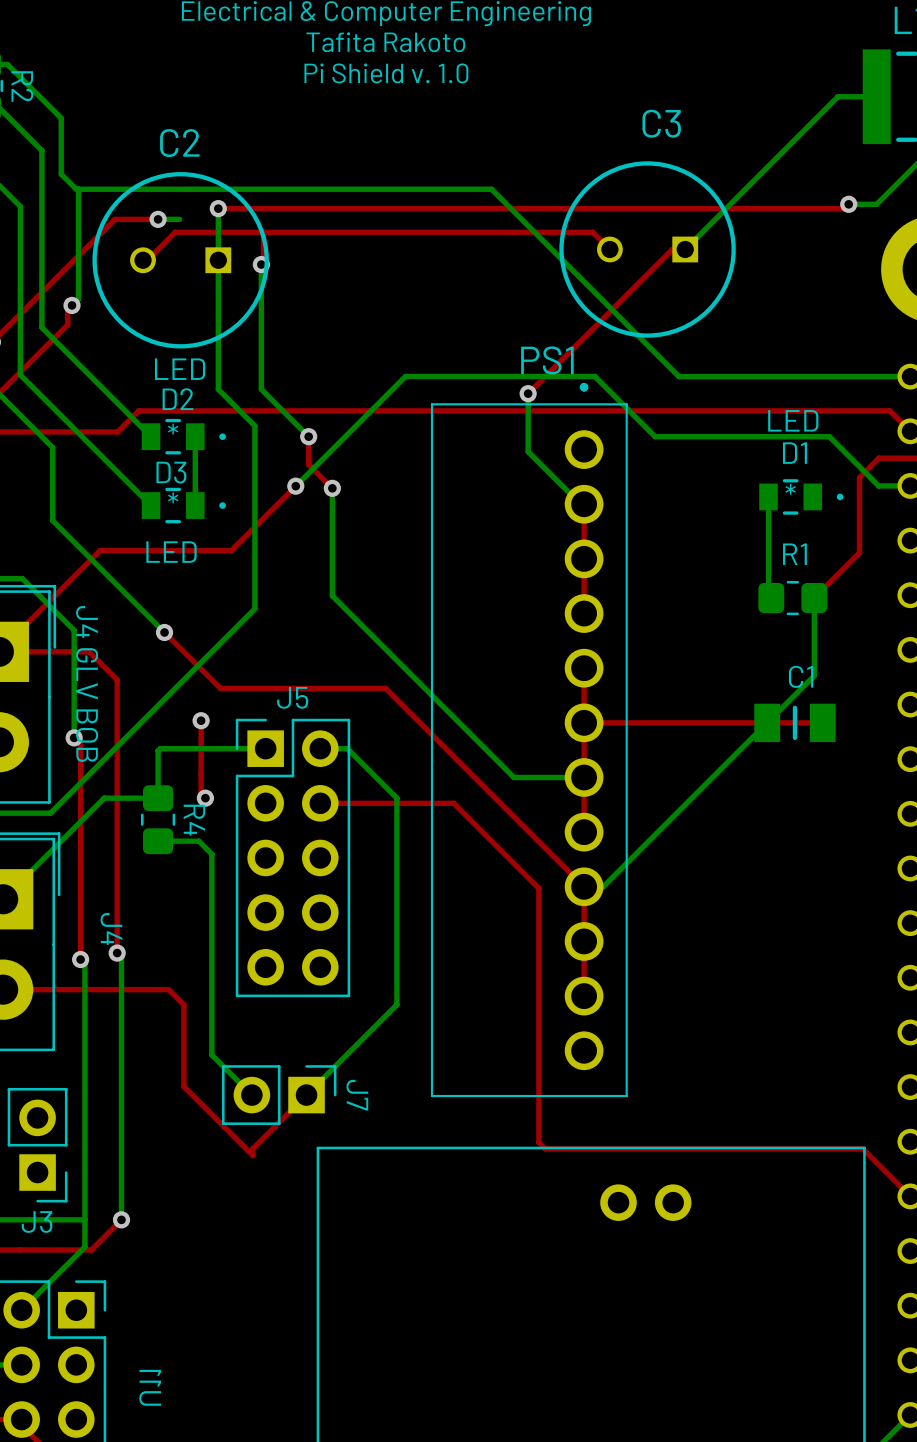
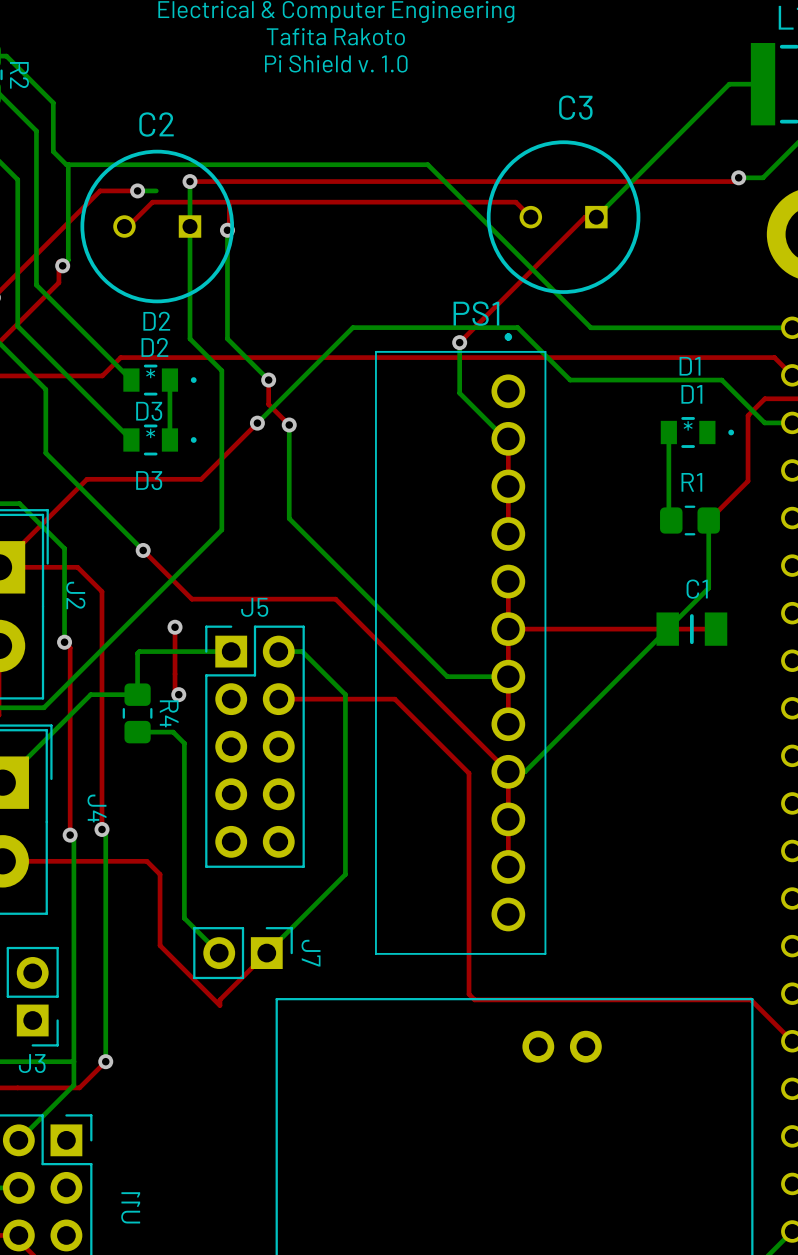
D2 value: LED (180, 369) -> D2 (156, 321)
D1 value: LED (793, 420) -> D1 (690, 366)
D3 value: LED (171, 552) -> D3 (149, 480)
part value: J4 GLV BOB (87, 683) -> J2 (75, 595)

